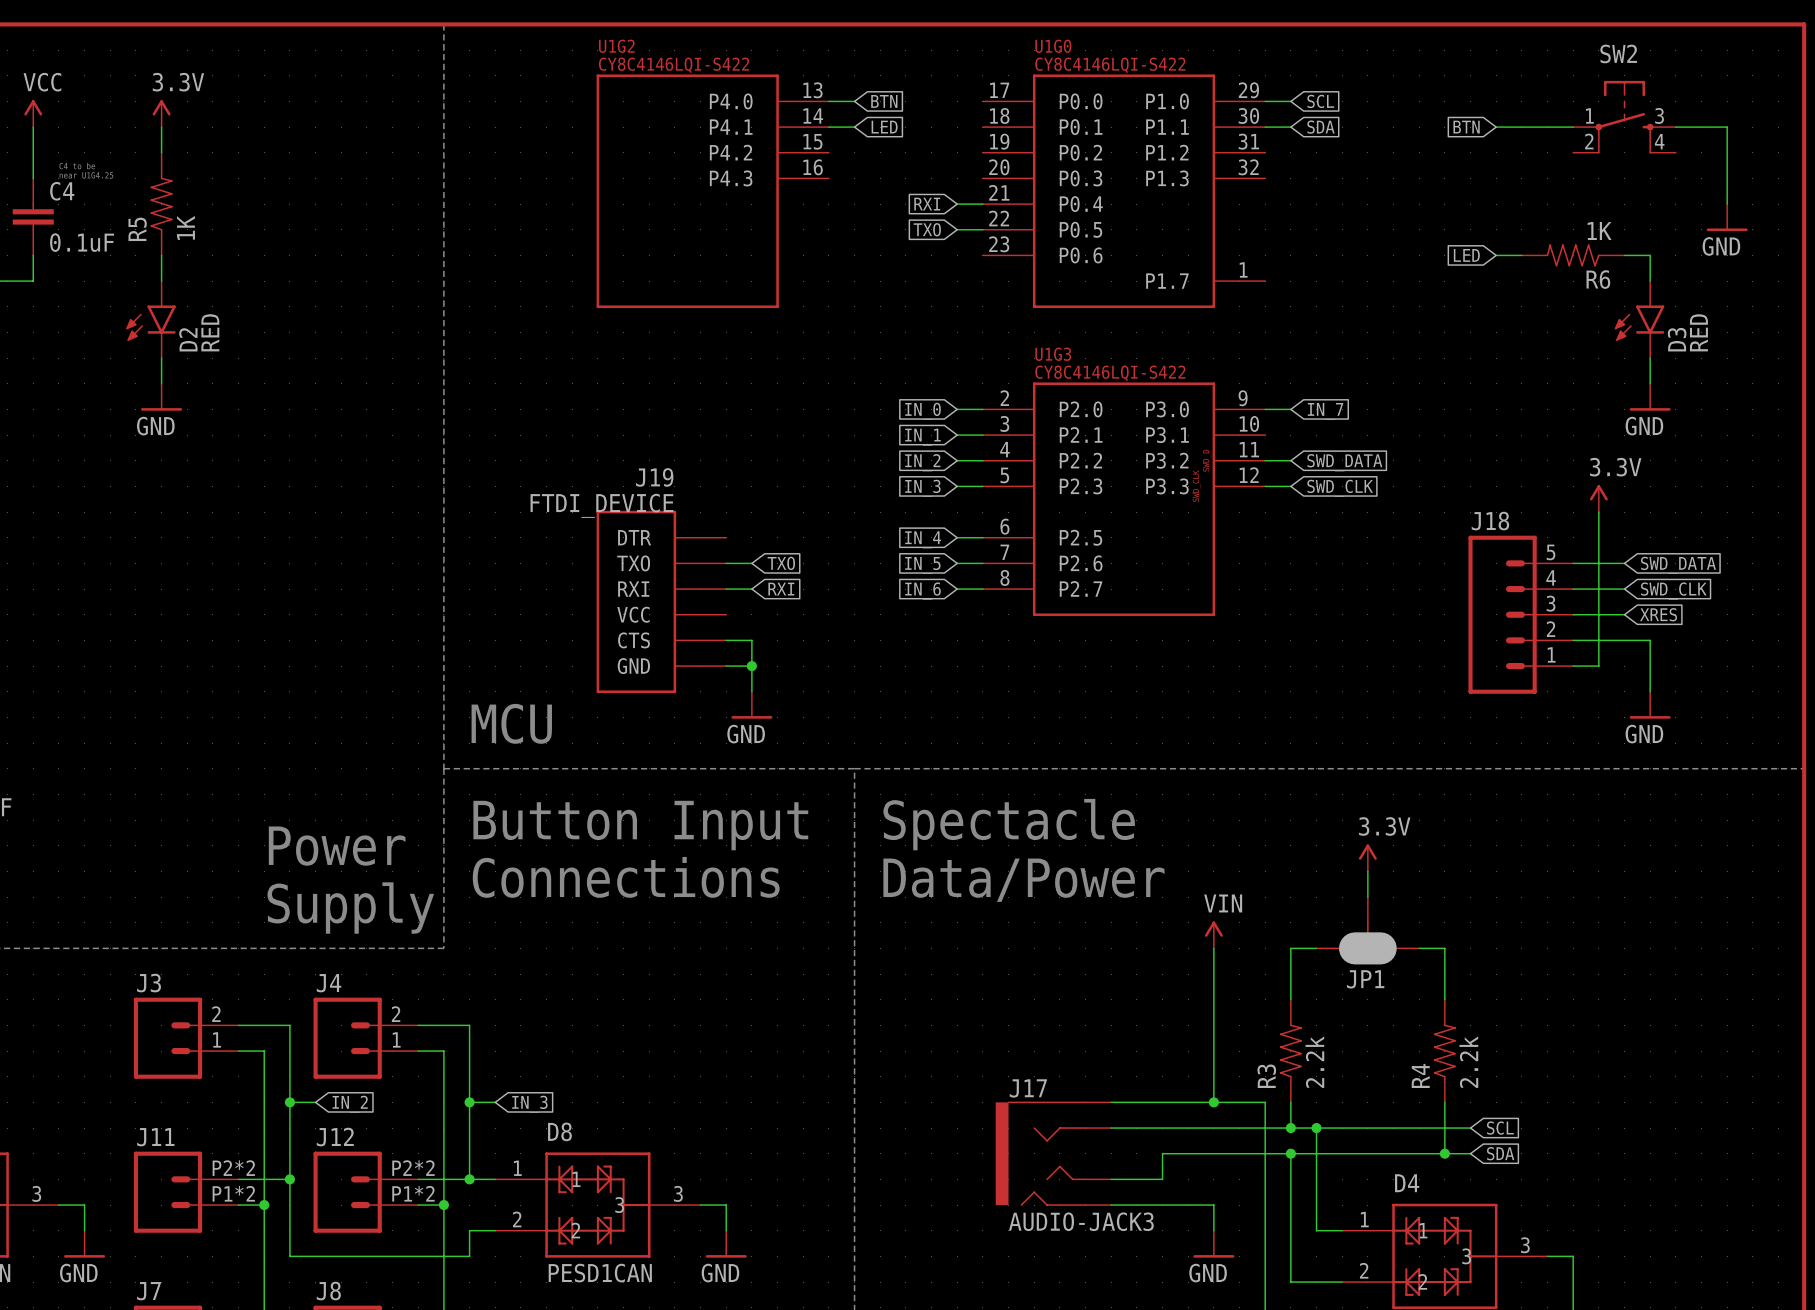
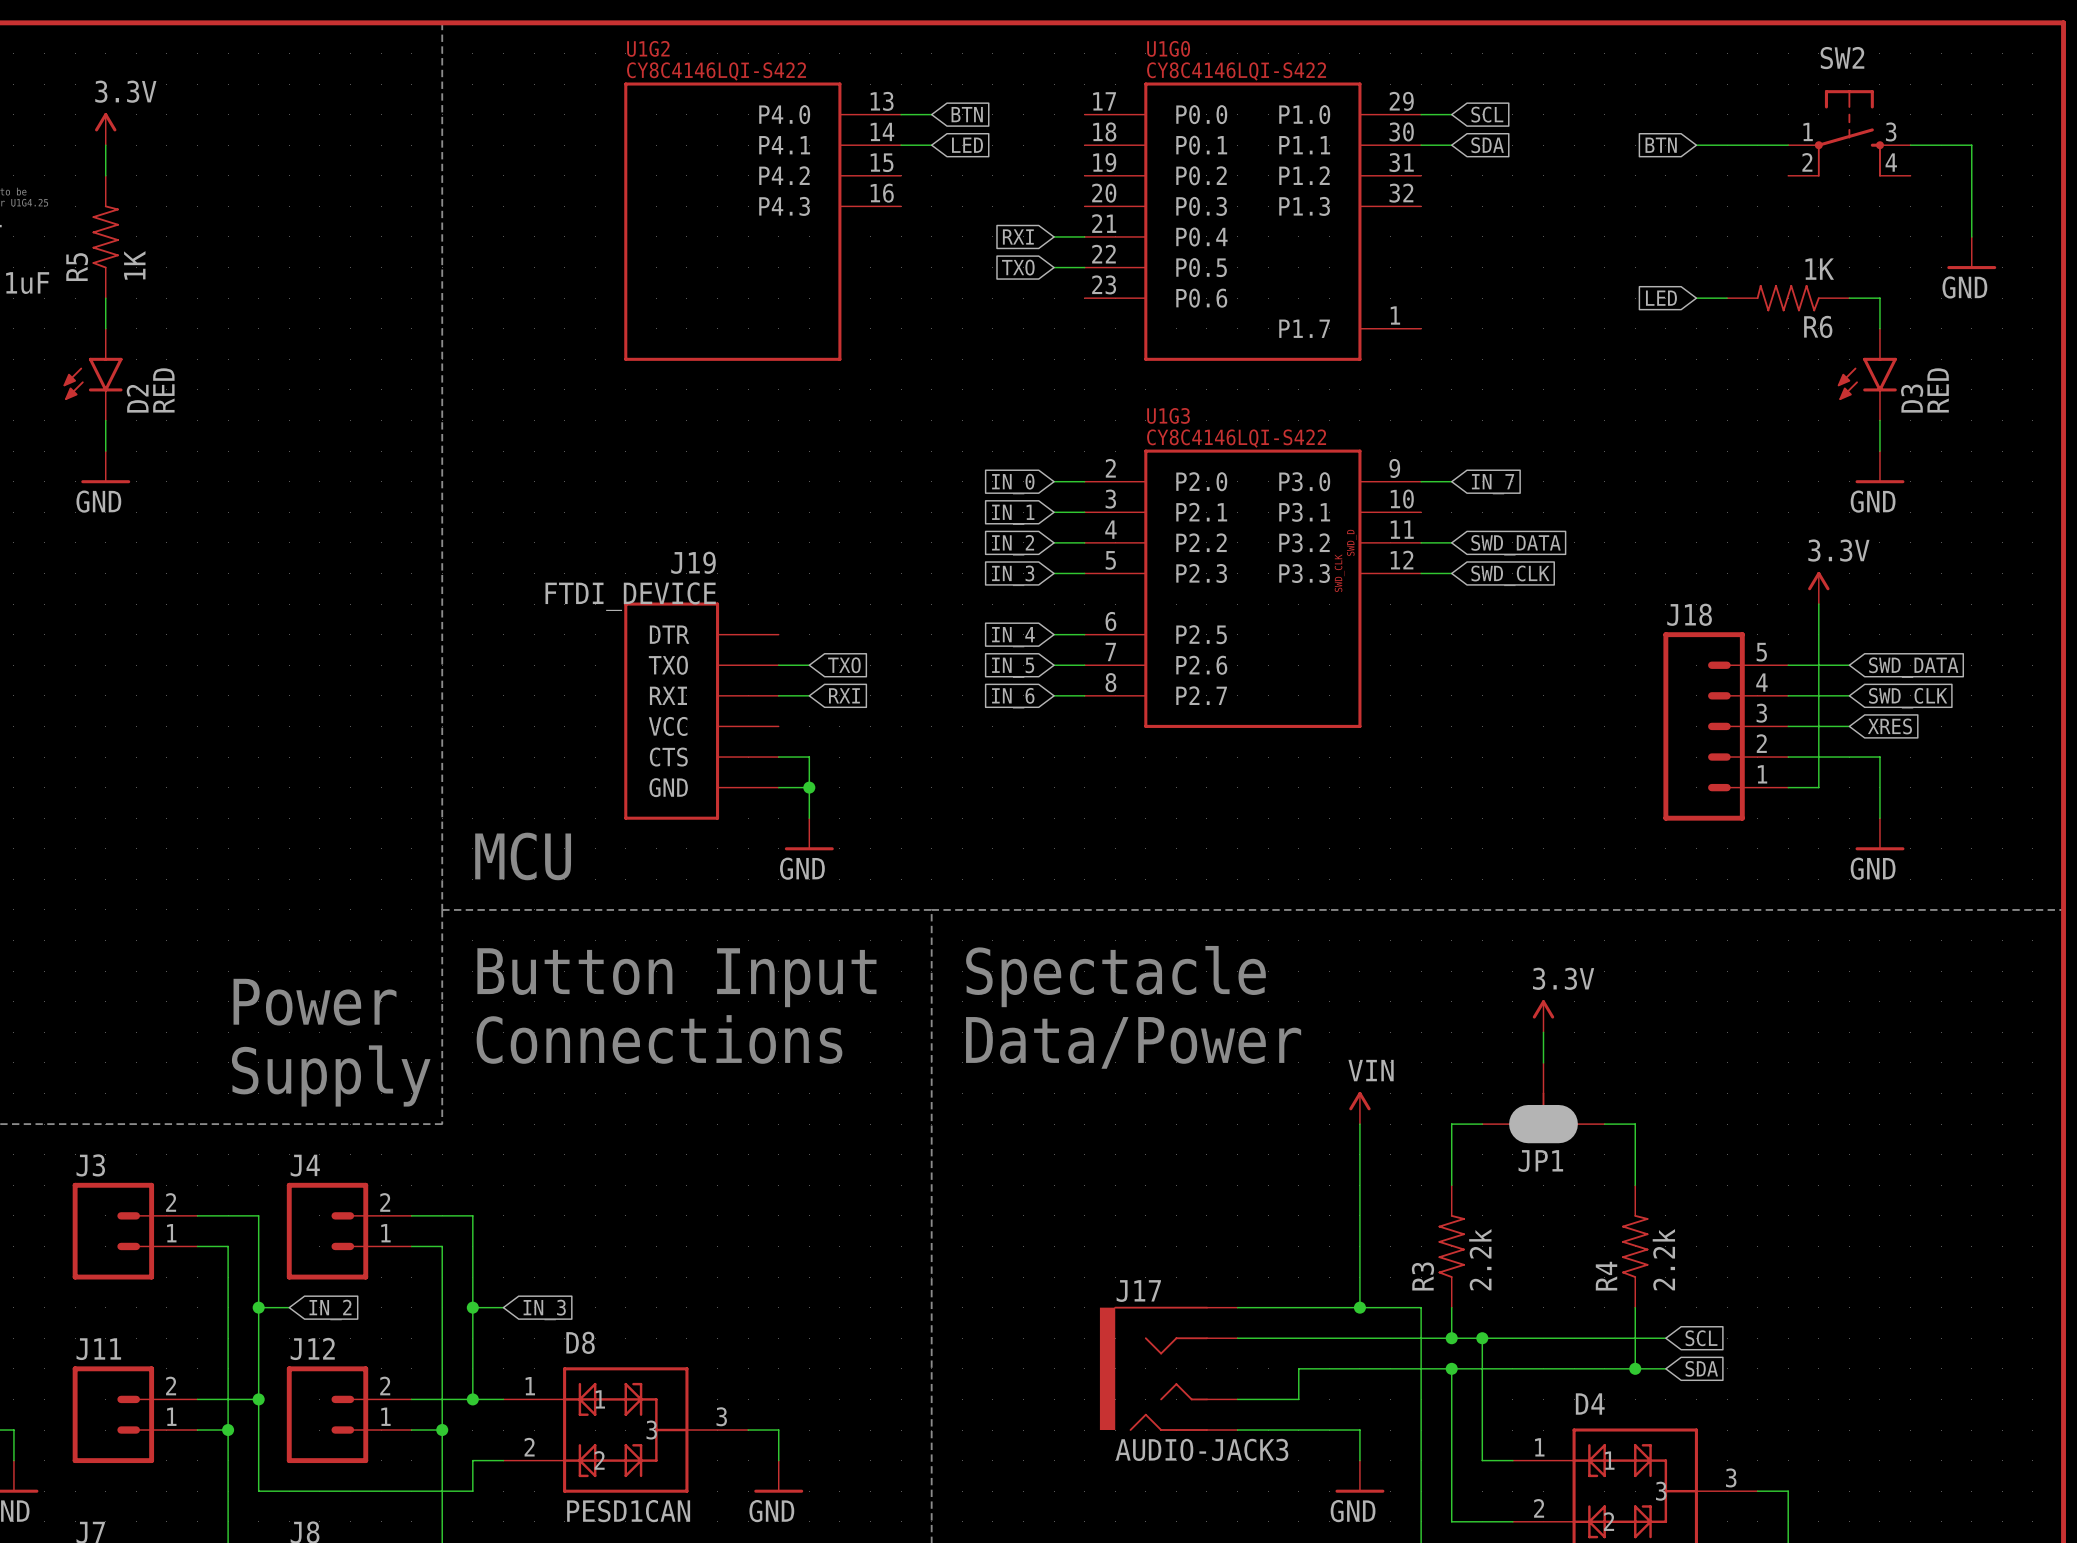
J11 pin number: P2*2 (233, 1168) -> 2 (171, 1386)
J12 pin number: P2*2 (413, 1168) -> 2 (385, 1386)
J11 pin number: P1*2 (233, 1193) -> 1 (171, 1416)
J12 pin number: P1*2 (413, 1193) -> 1 (385, 1416)

